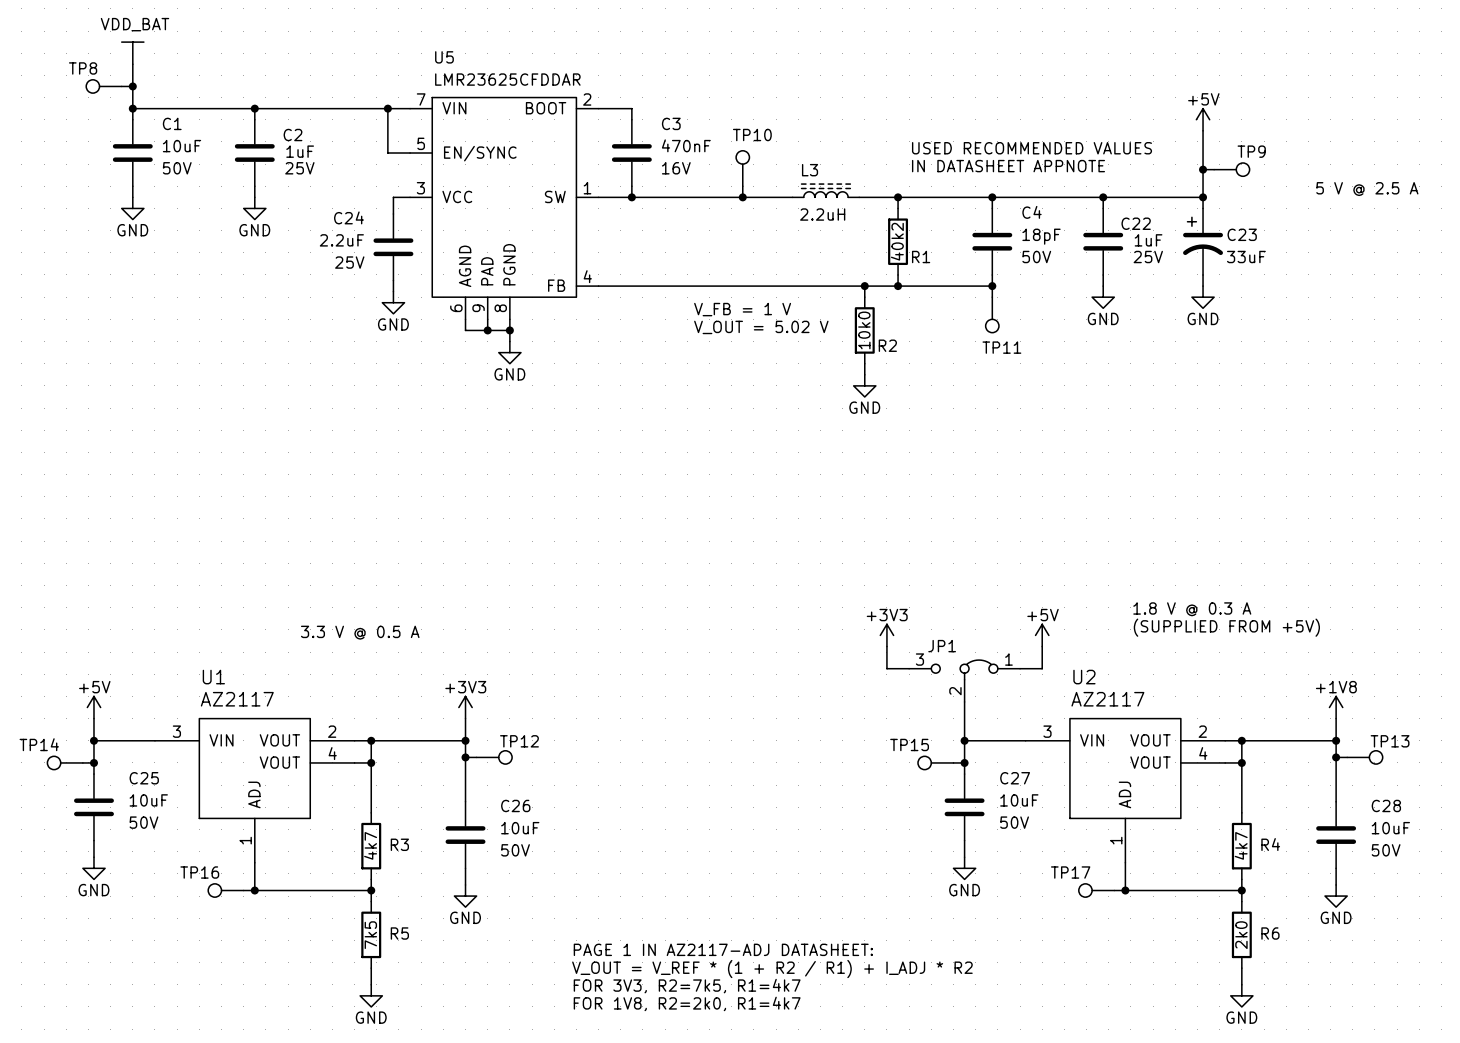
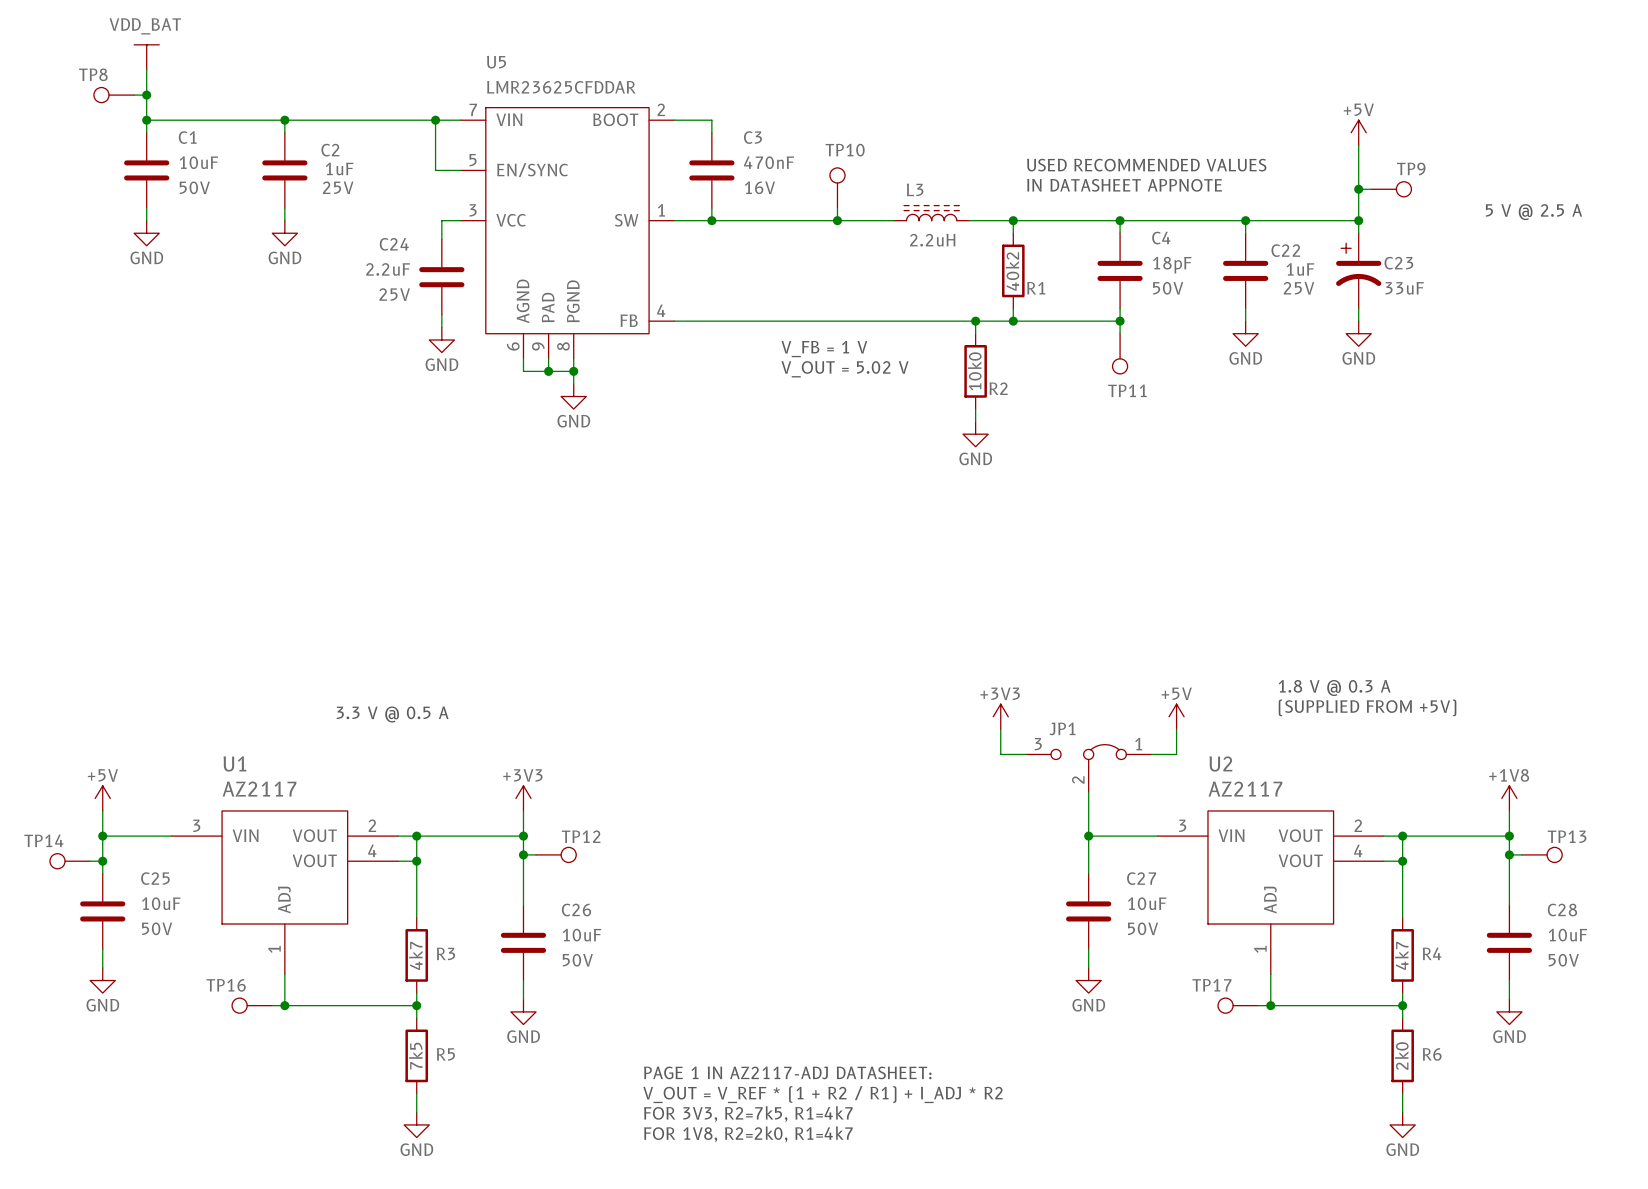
TP15: (935, 762) -> none
wire: (953, 762) (964, 762) -> none
junction: (964, 762) -> none

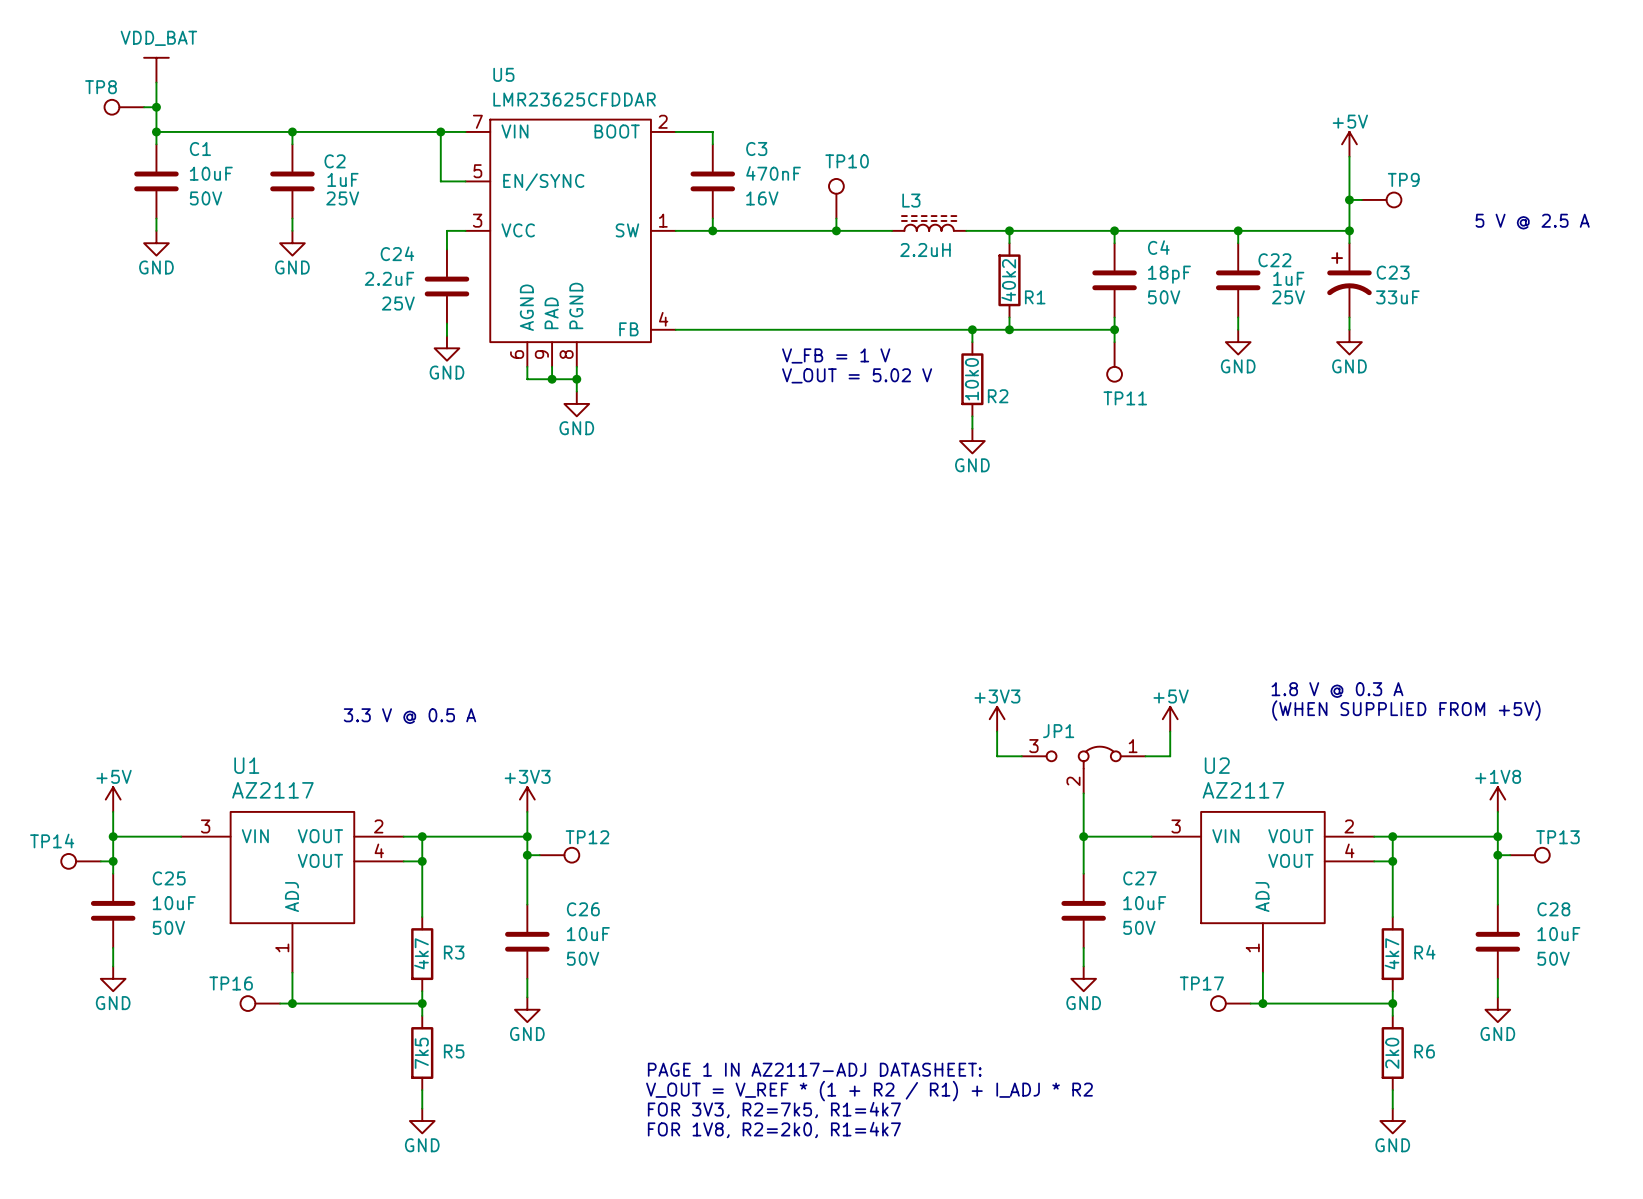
text: USED RECOMMENDED VALUES (1146, 165) -> none
text: IN DATASHEET APPNOTE (1124, 185) -> none
text: (SUPPLIED FROM +5V) (1367, 707) -> (WHEN SUPPLIED FROM +5V) (1406, 710)

